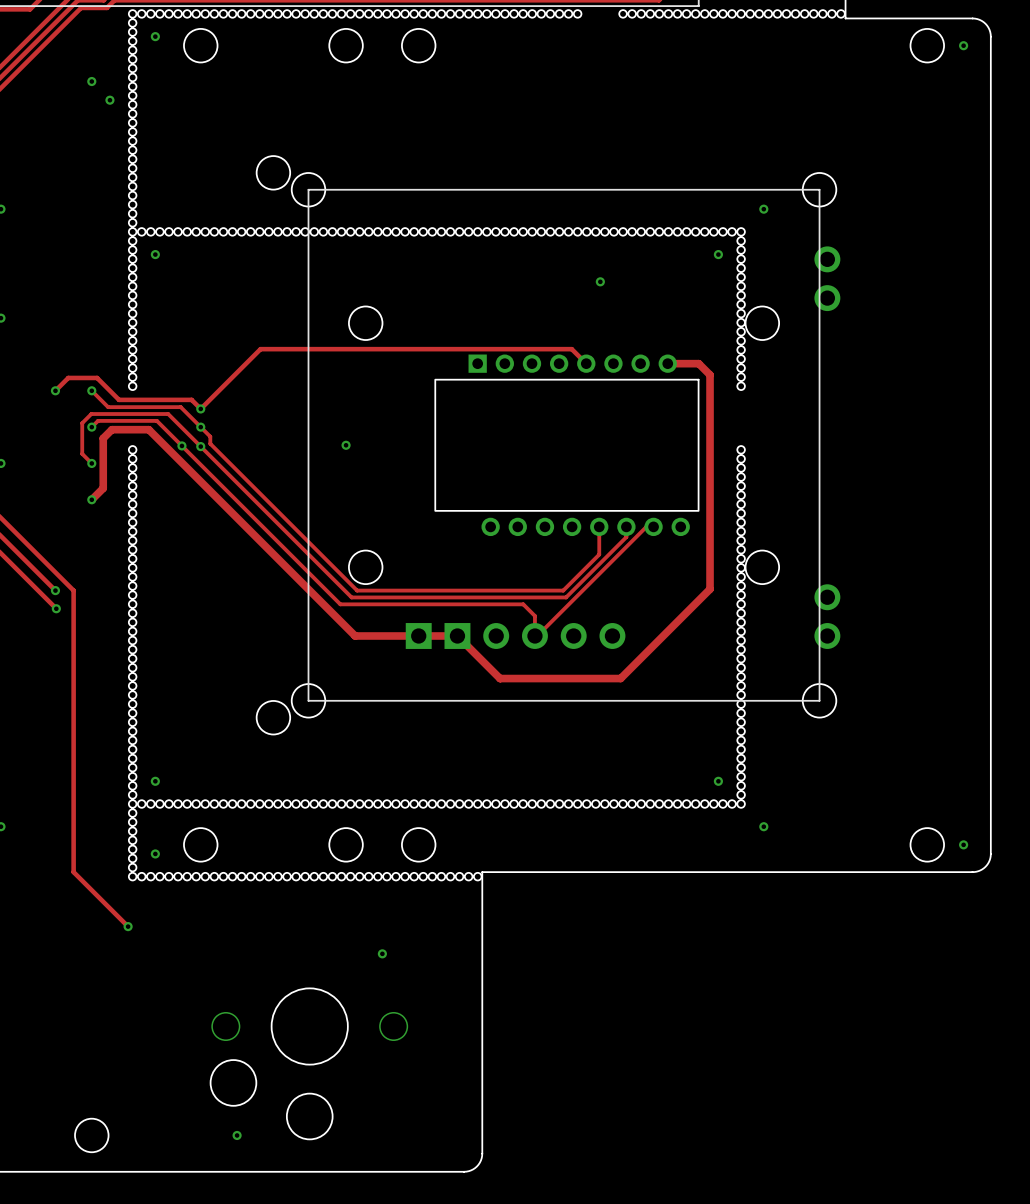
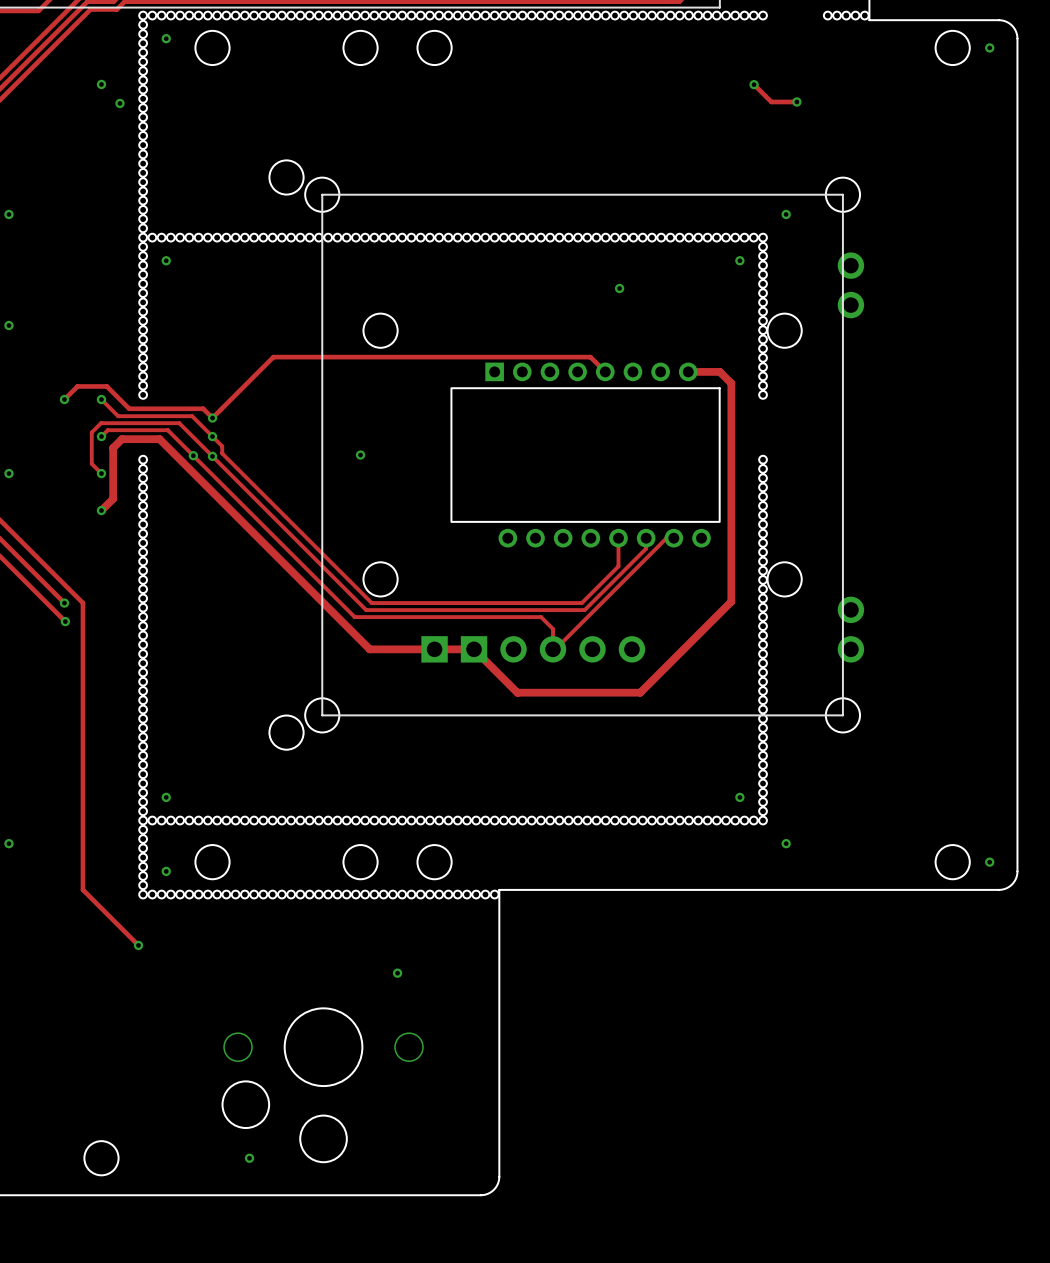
part footprint: [655, 10, 800, 18] -> [749, 11, 767, 20]
part: (636, 13) -> none
part: none -> (675, 15)
track: none -> (754, 84) (771, 101) (796, 101)
via: none -> (754, 84)
via: none -> (796, 101)

